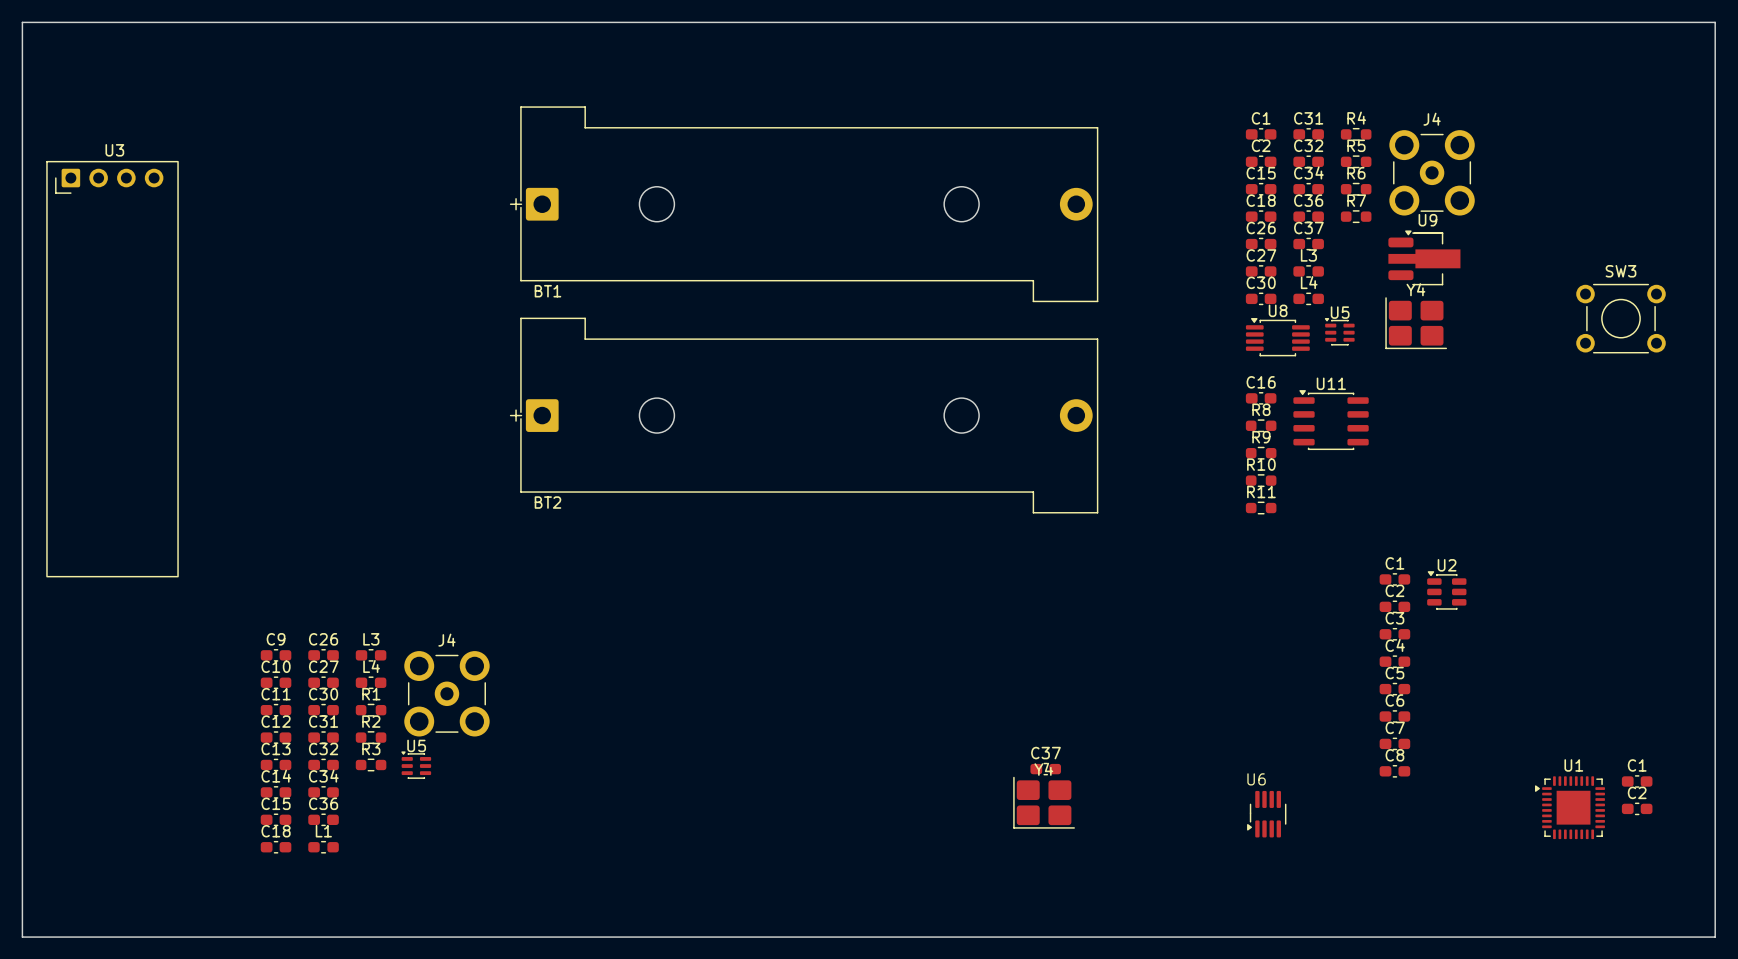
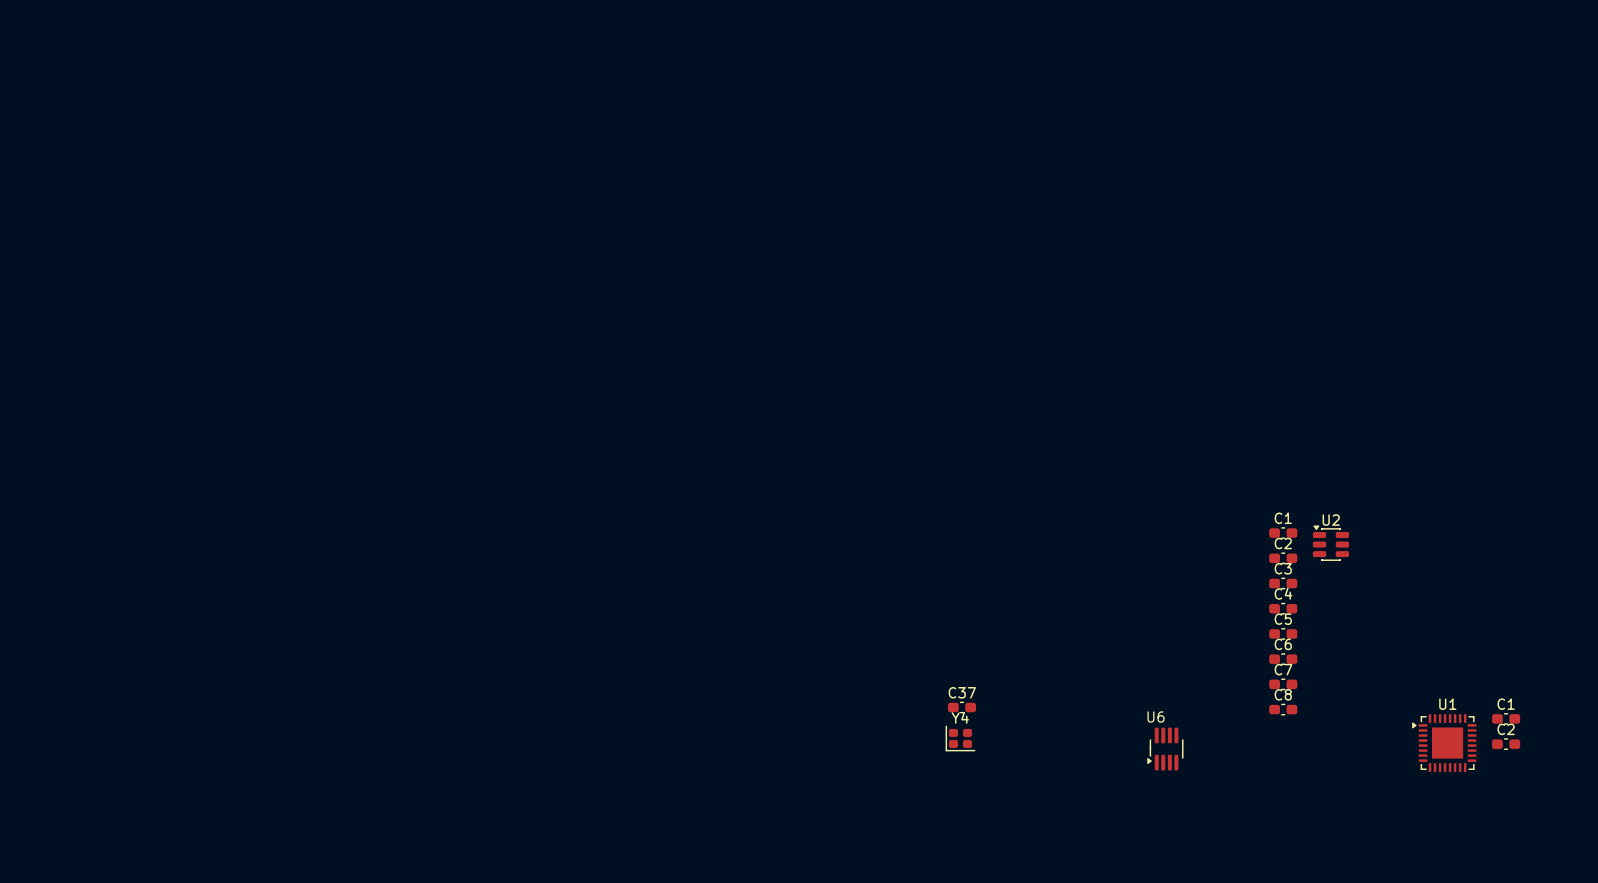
board edge: (22, 22) (1715, 22) (1715, 937) (22, 937) (22, 22) -> none
C1: (1261, 134) -> none
C31: (1308, 134) -> none
R4: (1356, 134) -> none
C2: (1261, 161) -> none
C32: (1308, 161) -> none
R5: (1356, 161) -> none
J4: (1432, 172) -> none
C15: (1261, 189) -> none
C34: (1308, 189) -> none
R6: (1356, 189) -> none
BT1: (804, 204) -> none
C18: (1261, 216) -> none
C36: (1308, 216) -> none
R7: (1356, 216) -> none
C26: (1261, 244) -> none
C37: (1308, 244) -> none
U9: (1424, 257) -> none
C27: (1261, 271) -> none
L3: (1308, 271) -> none
C30: (1261, 298) -> none
L4: (1308, 298) -> none
SW3: (1621, 318) -> none
Y4: (1416, 323) -> none
U5: (1339, 331) -> none
U8: (1277, 337) -> none
U3: (112, 369) -> none
C16: (1261, 398) -> none
BT2: (804, 415) -> none
U11: (1331, 420) -> none
R8: (1261, 425) -> none
R9: (1261, 453) -> none
R10: (1261, 480) -> none
R11: (1261, 508) -> none
C9: (276, 655) -> none
C26: (323, 655) -> none
L3: (371, 655) -> none
C10: (276, 682) -> none
C27: (323, 682) -> none
L4: (371, 682) -> none
J4: (446, 693) -> none
C11: (276, 710) -> none
C30: (323, 710) -> none
R1: (371, 710) -> none
C12: (276, 737) -> none
C31: (323, 737) -> none
R2: (371, 737) -> none
C13: (276, 764) -> none
C32: (323, 764) -> none
R3: (371, 764) -> none
U5: (416, 765) -> none
Y4 footprint: [1013, 776, 1075, 829] -> [945, 725, 976, 752]
C14: (276, 792) -> none
C34: (323, 792) -> none
C15: (276, 819) -> none
C36: (323, 819) -> none
C18: (276, 847) -> none
L1: (323, 847) -> none

